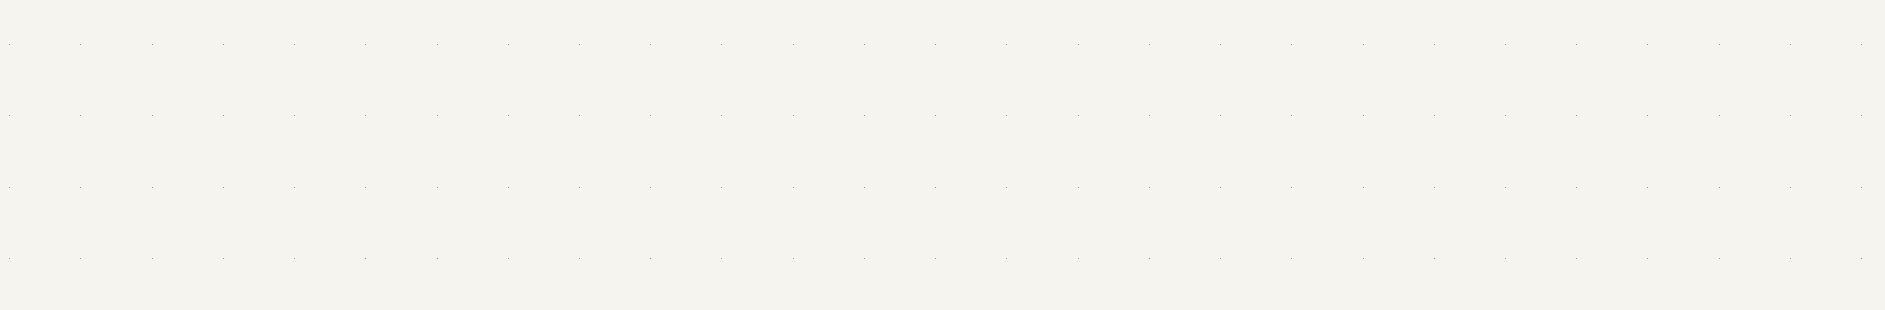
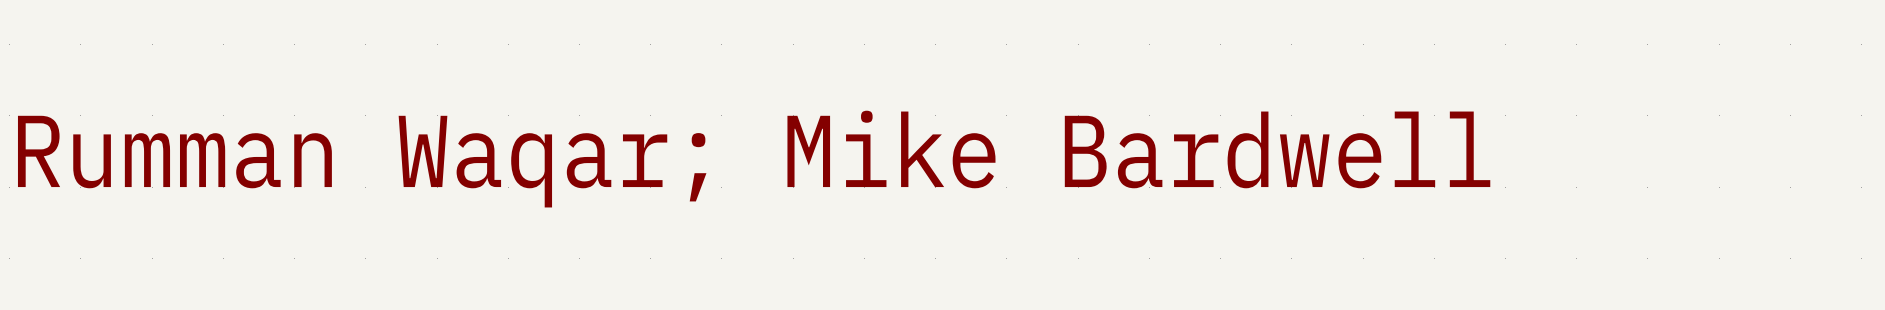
text: none -> Rumman Waqar; Mike Bardwell (754, 159)

